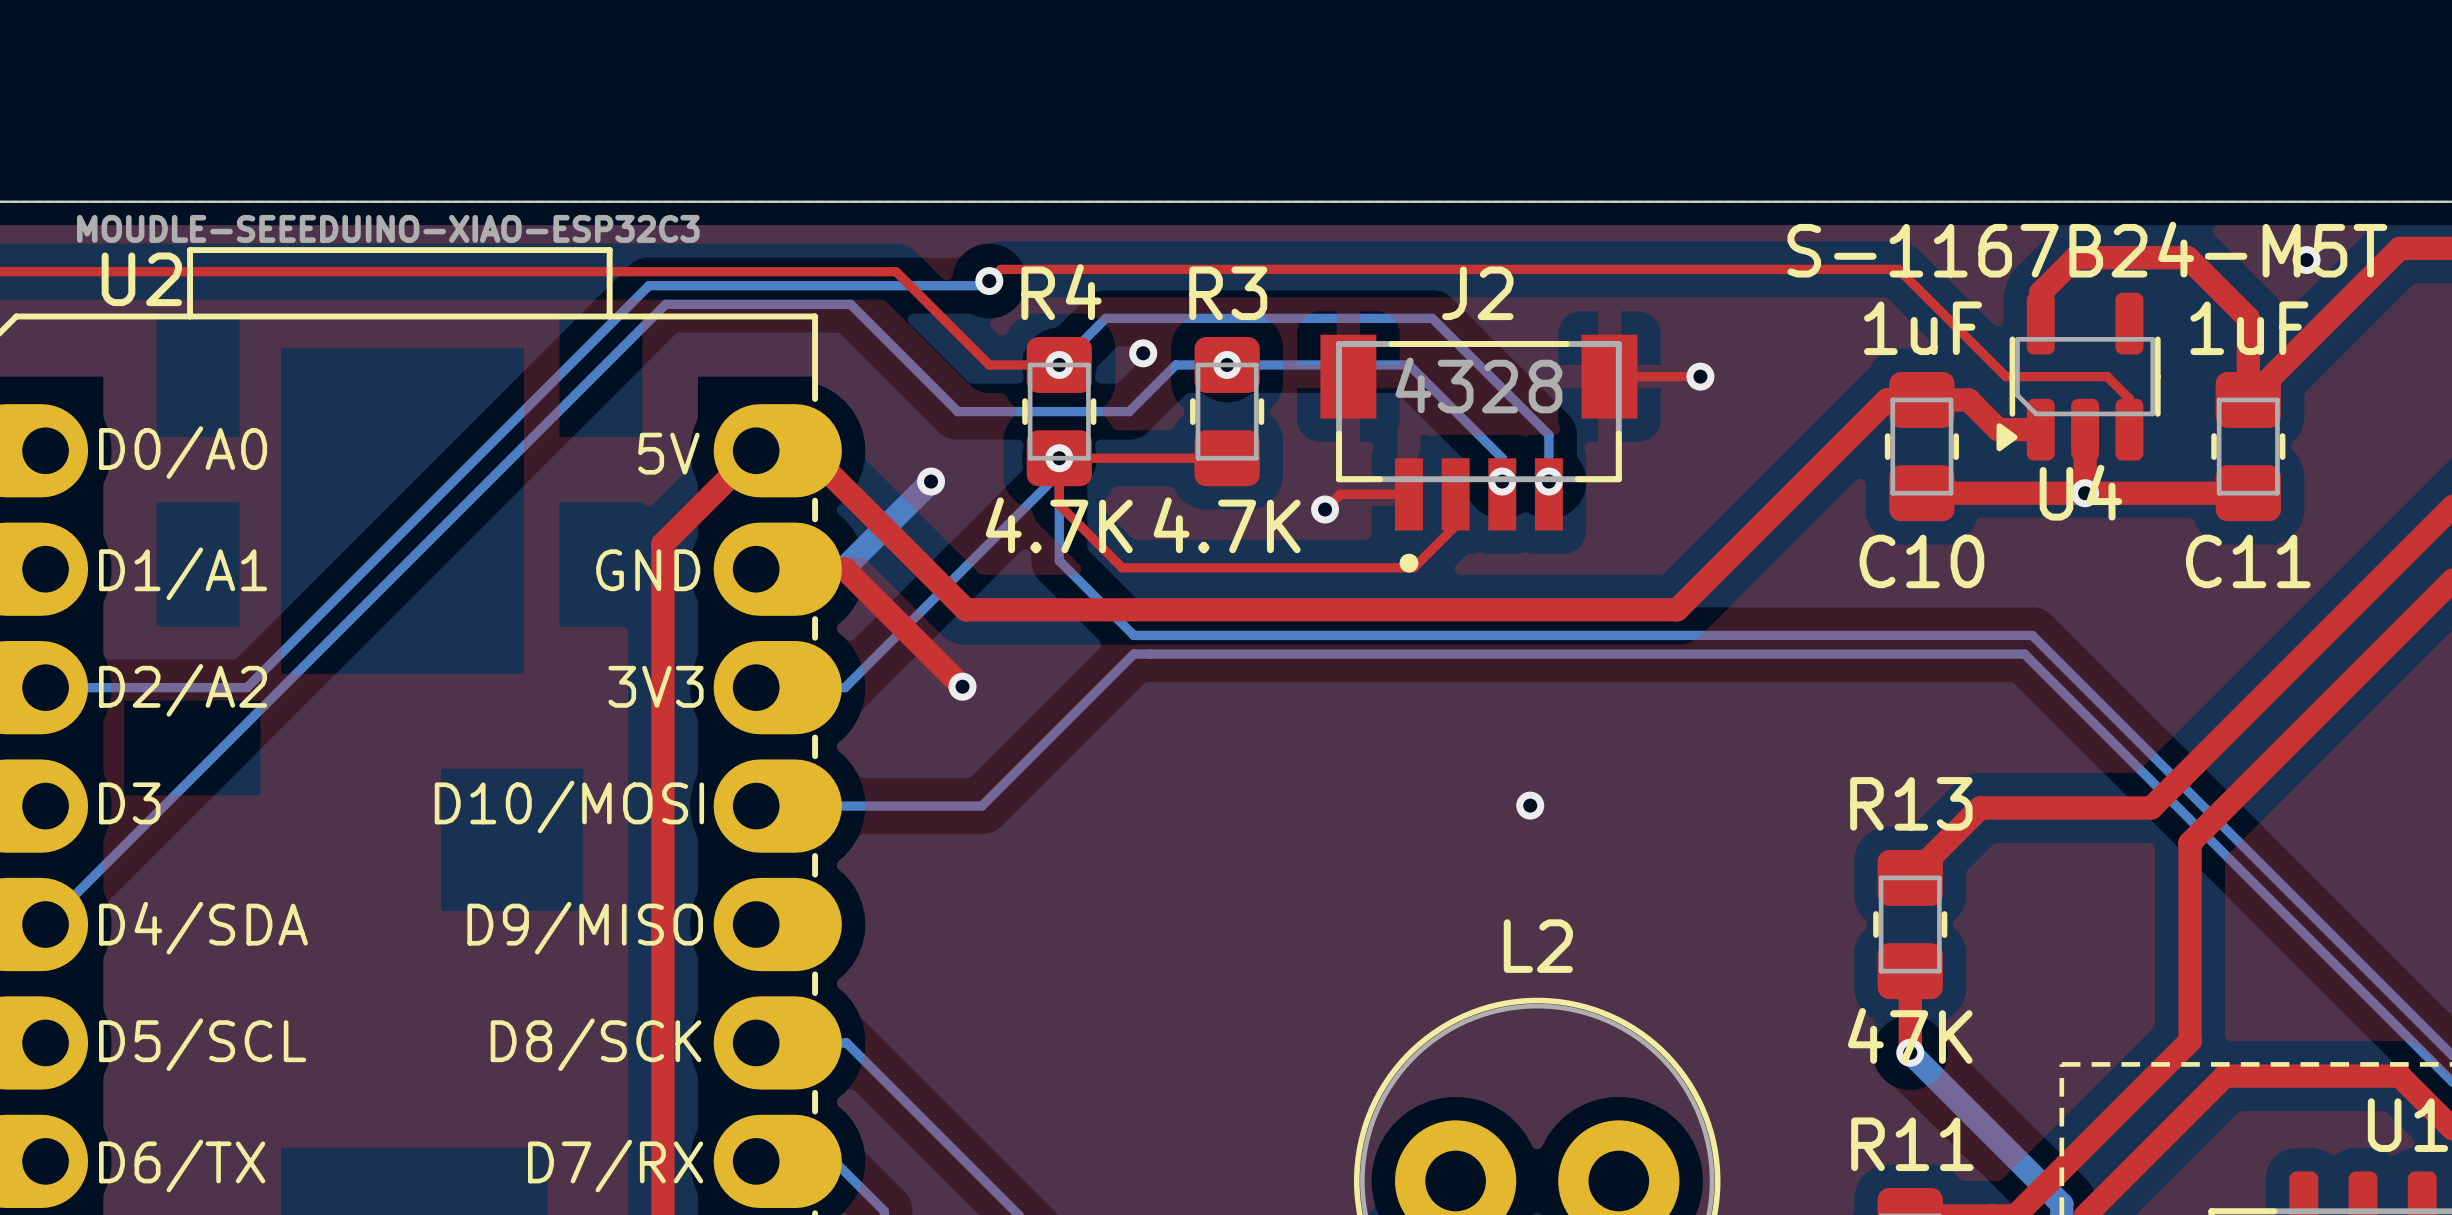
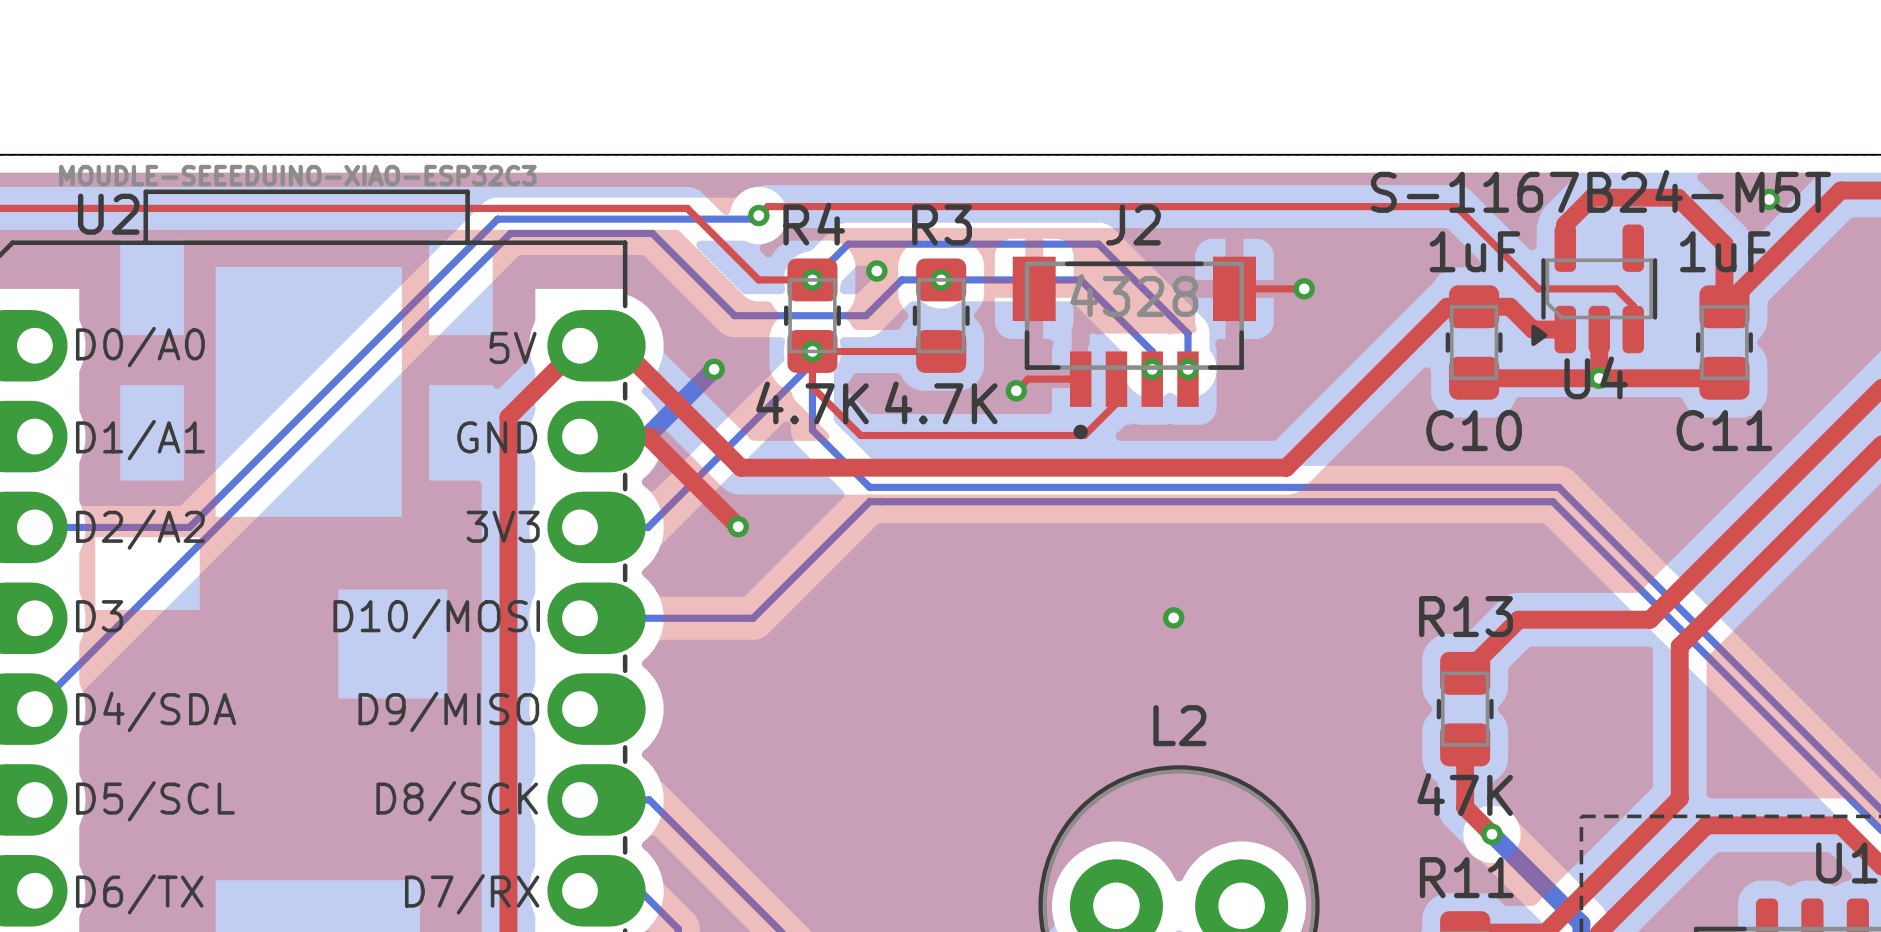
top track: none -> (1465, 807) (1491, 834)
bottom track: (1910, 1052) (1945, 1087) -> none
via position: (1910, 1052) -> (1491, 834)

